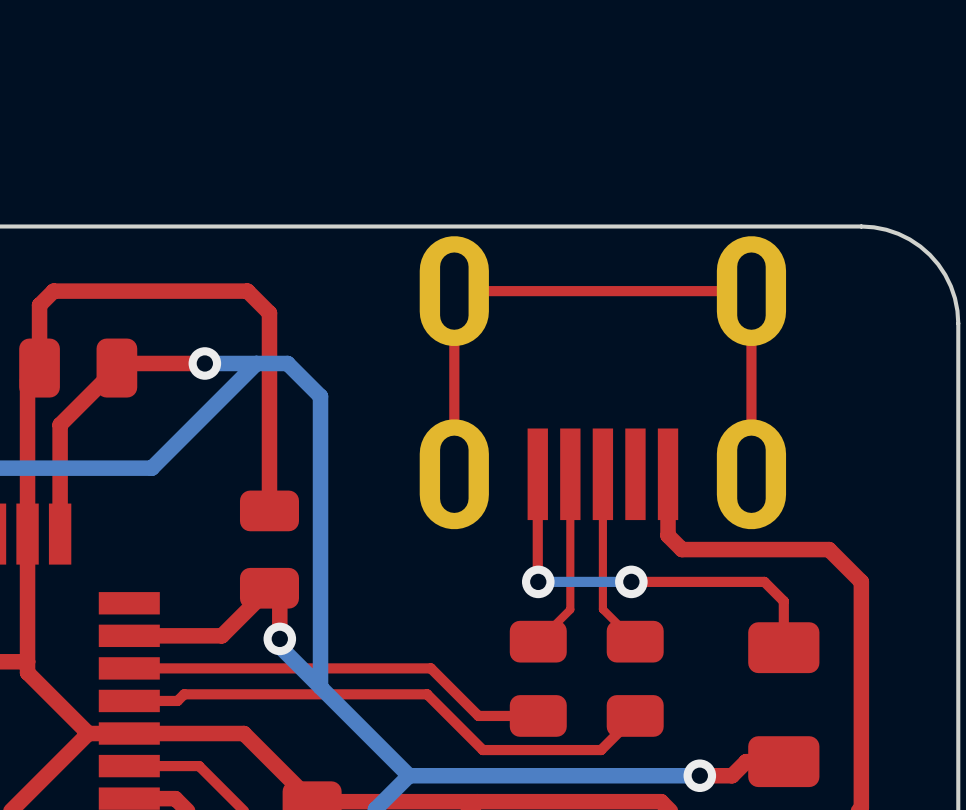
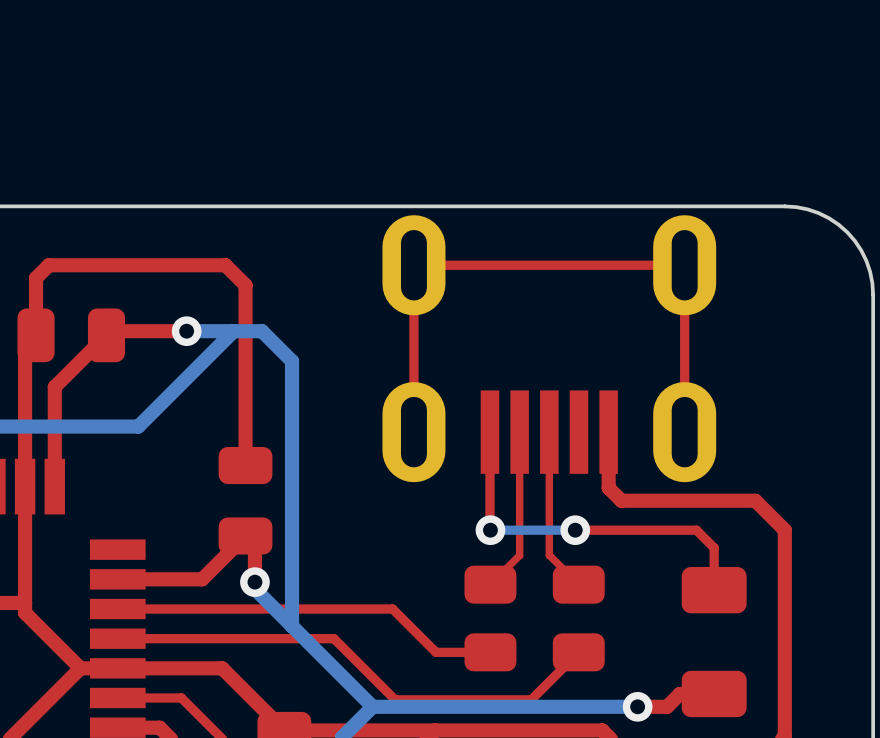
top track: (177, 700) (184, 694) (427, 694) (482, 750) (601, 750) -> (161, 638) (333, 638) (395, 699) (531, 699) (547, 683)

